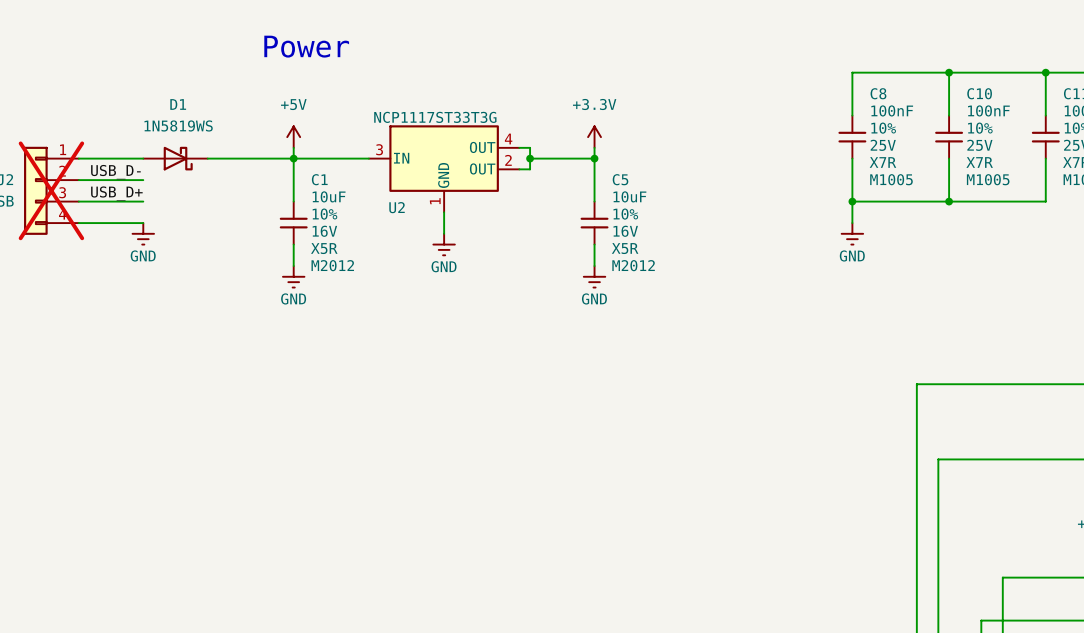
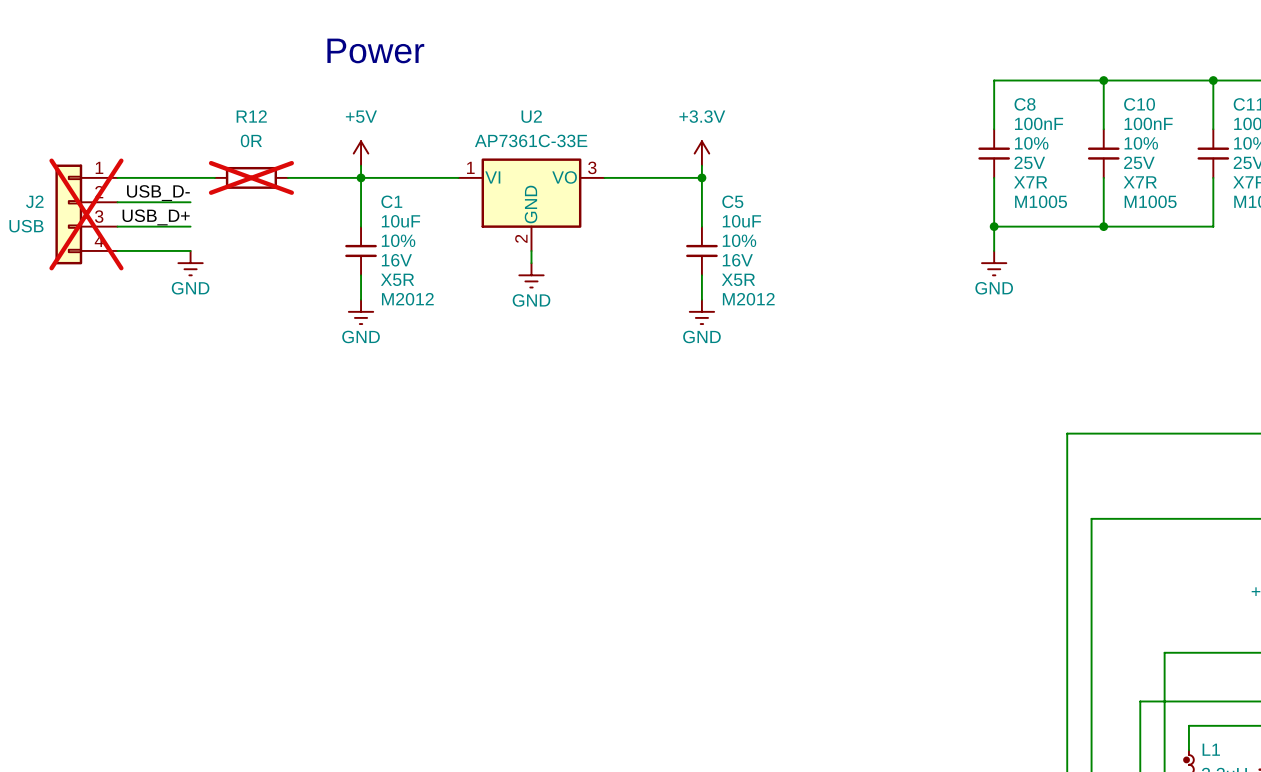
U2 value: NCP1117ST33T3G (435, 117) -> AP7361C-33E (531, 140)
U2 symbol: [368, 125, 520, 213] -> [458, 158, 605, 251]
wire: (519, 147) (530, 147) (530, 169) (519, 169) -> none
D1: 1N5819WS (175, 158) -> none
R12: none -> 0R (251, 177)
wire: none -> (604, 177) (628, 177)
junction: (530, 158) -> none
U2 name position: U2 (397, 207) -> U2 (531, 116)

